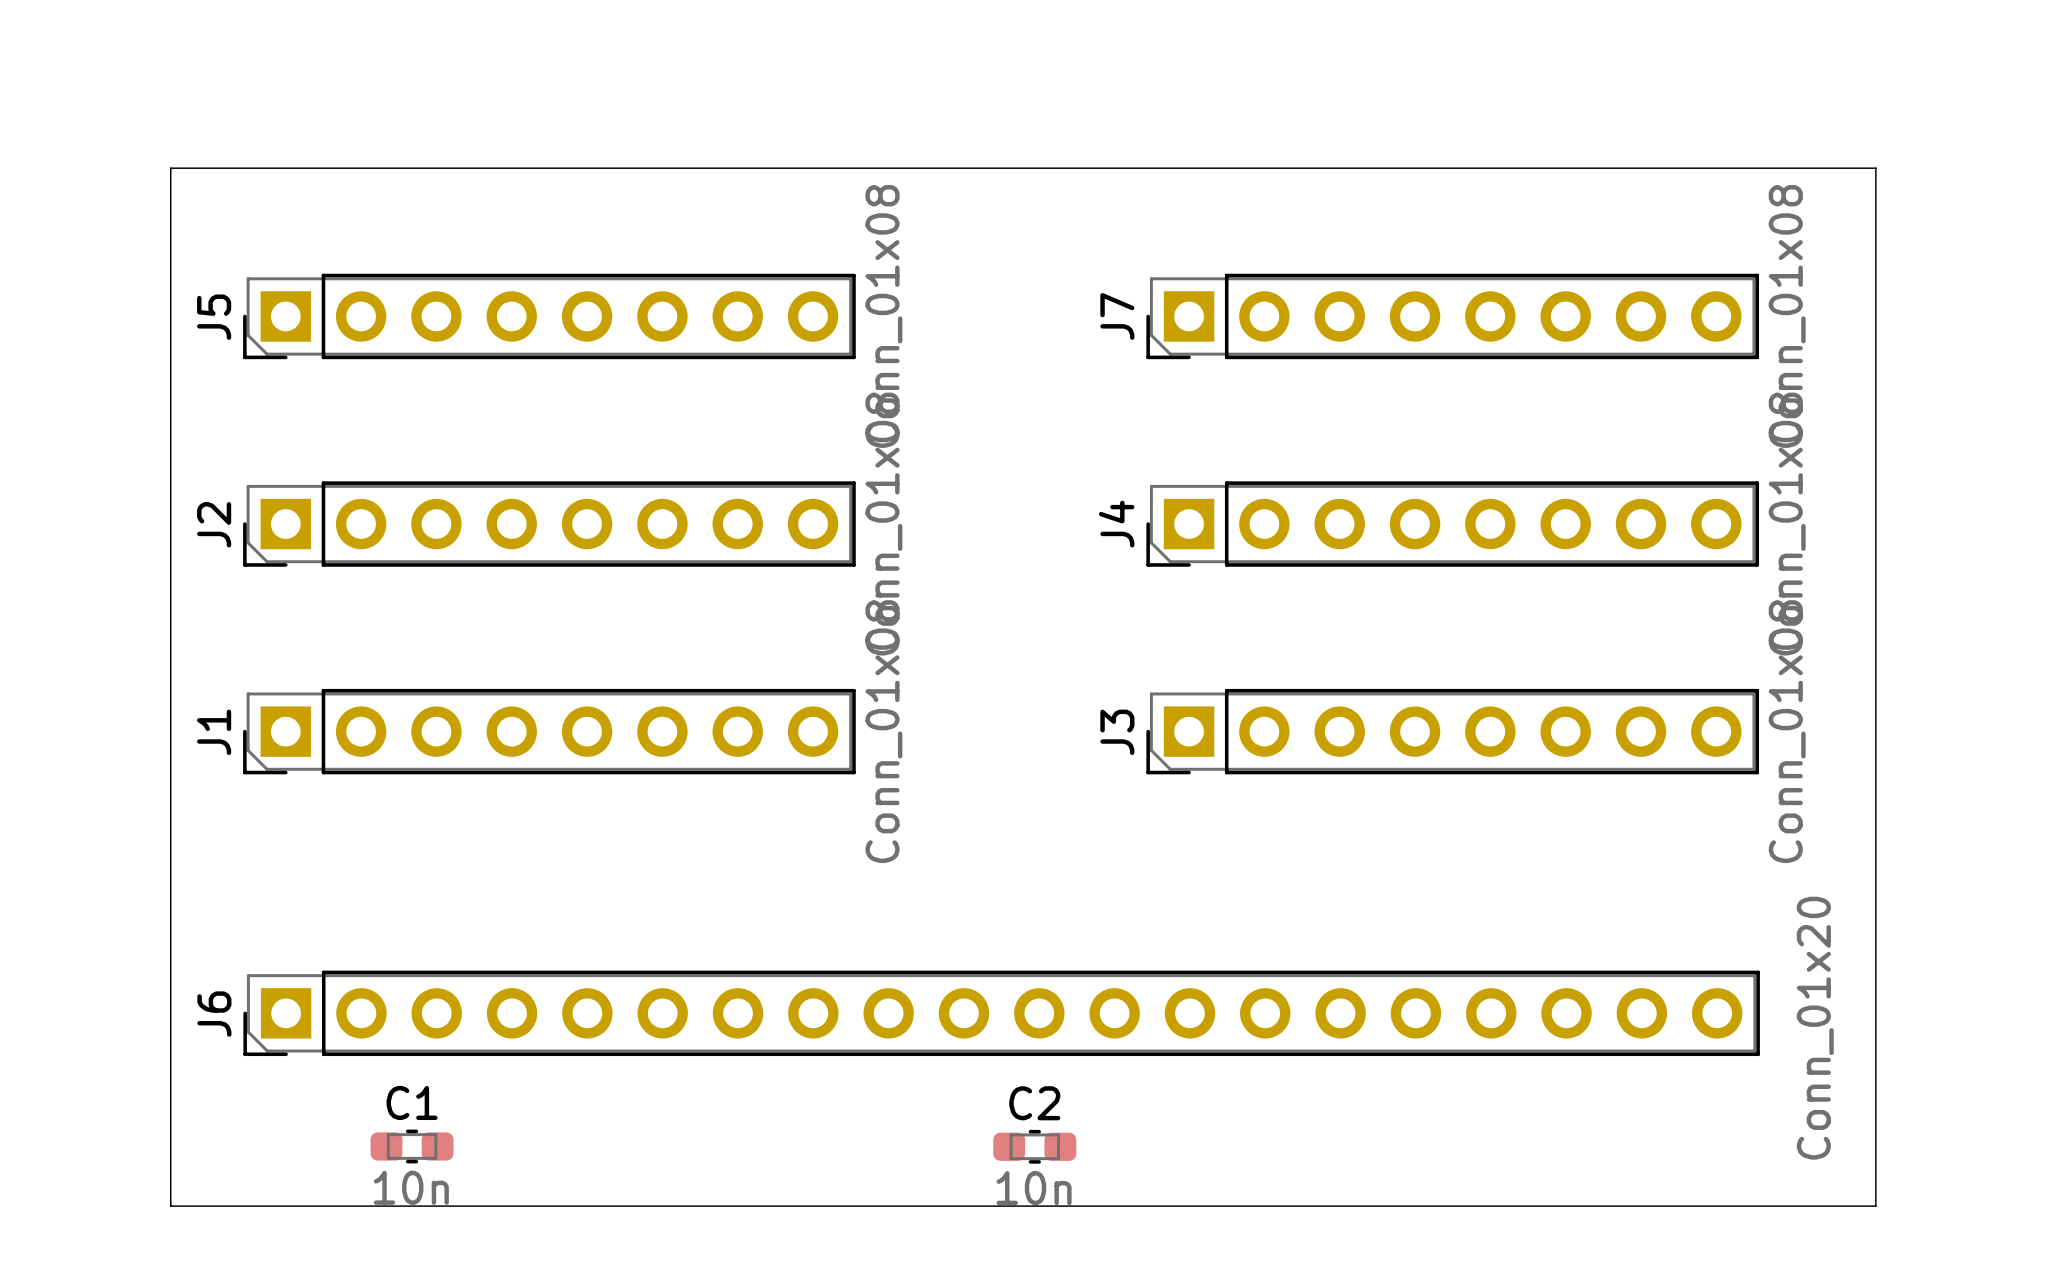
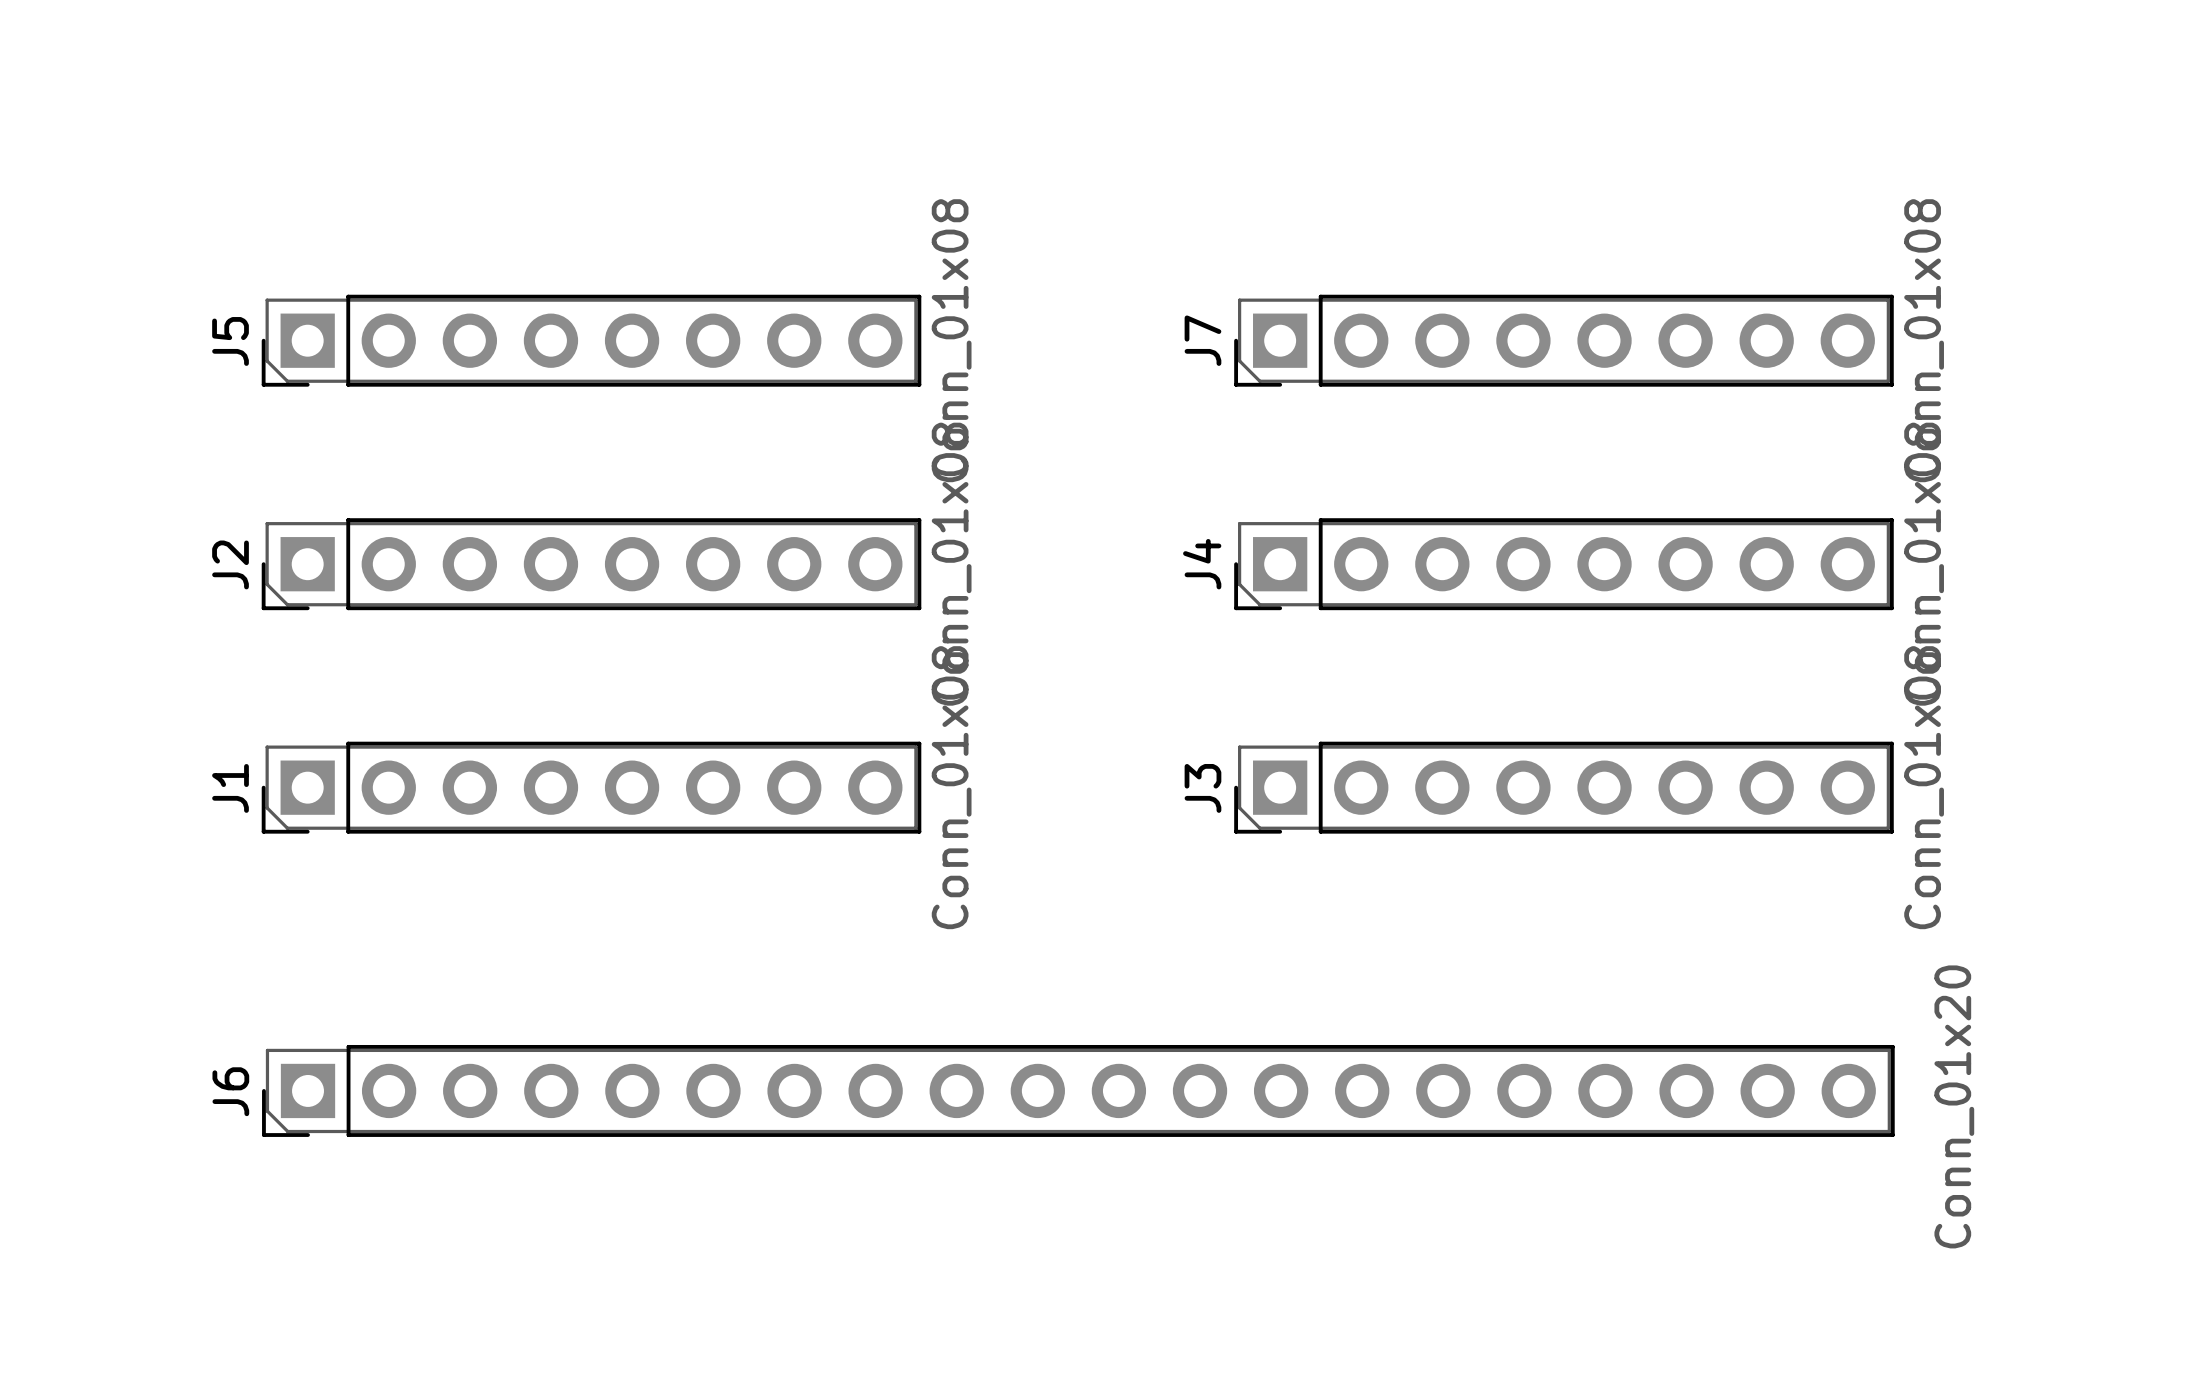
board edge: (170, 168) (1875, 168) (1875, 1206) (170, 1206) (170, 168) -> none
C1: 10n (412, 1146) -> none
C2: 10n (1034, 1146) -> none

